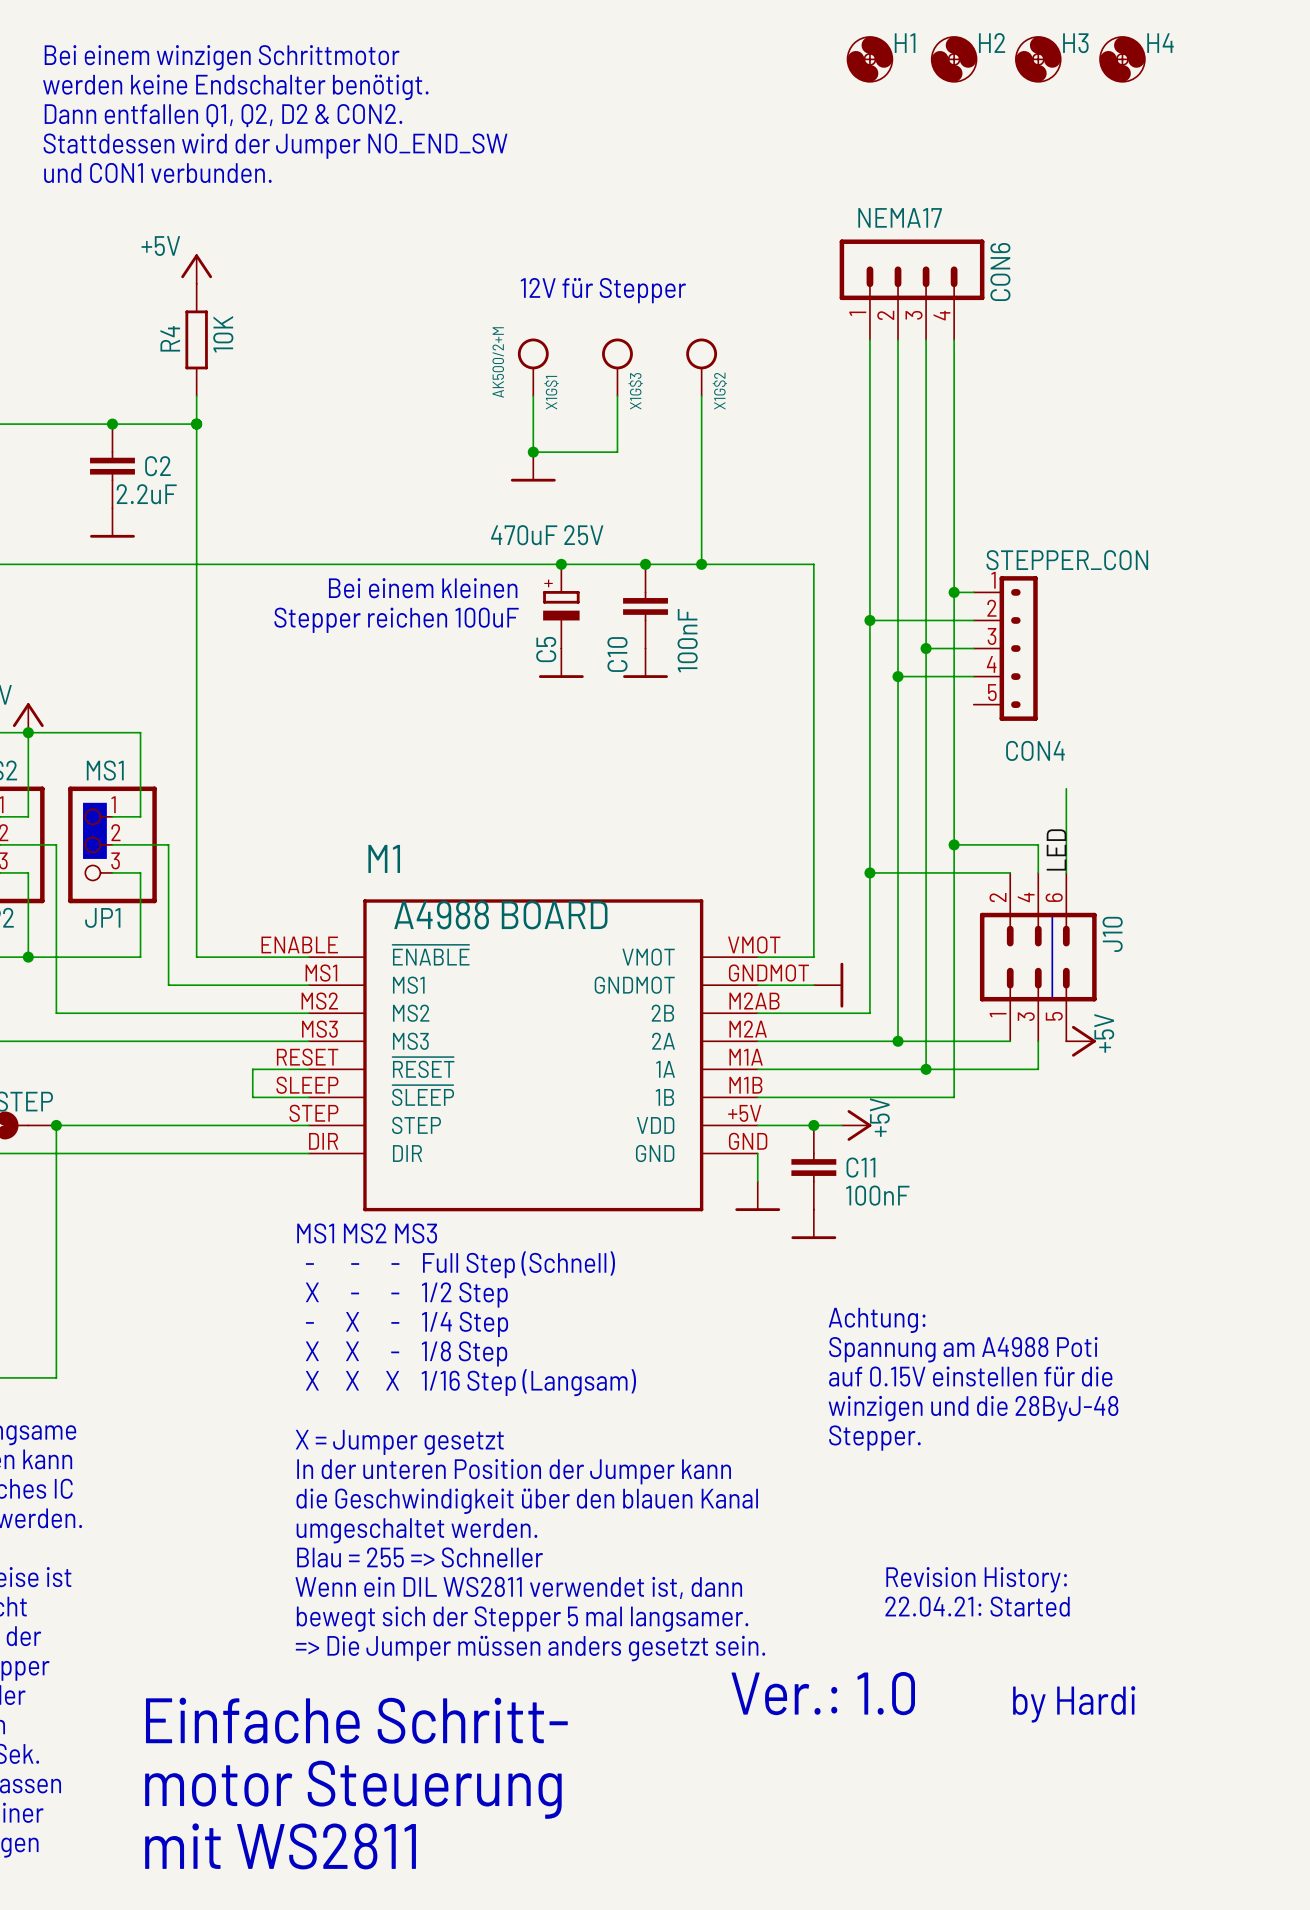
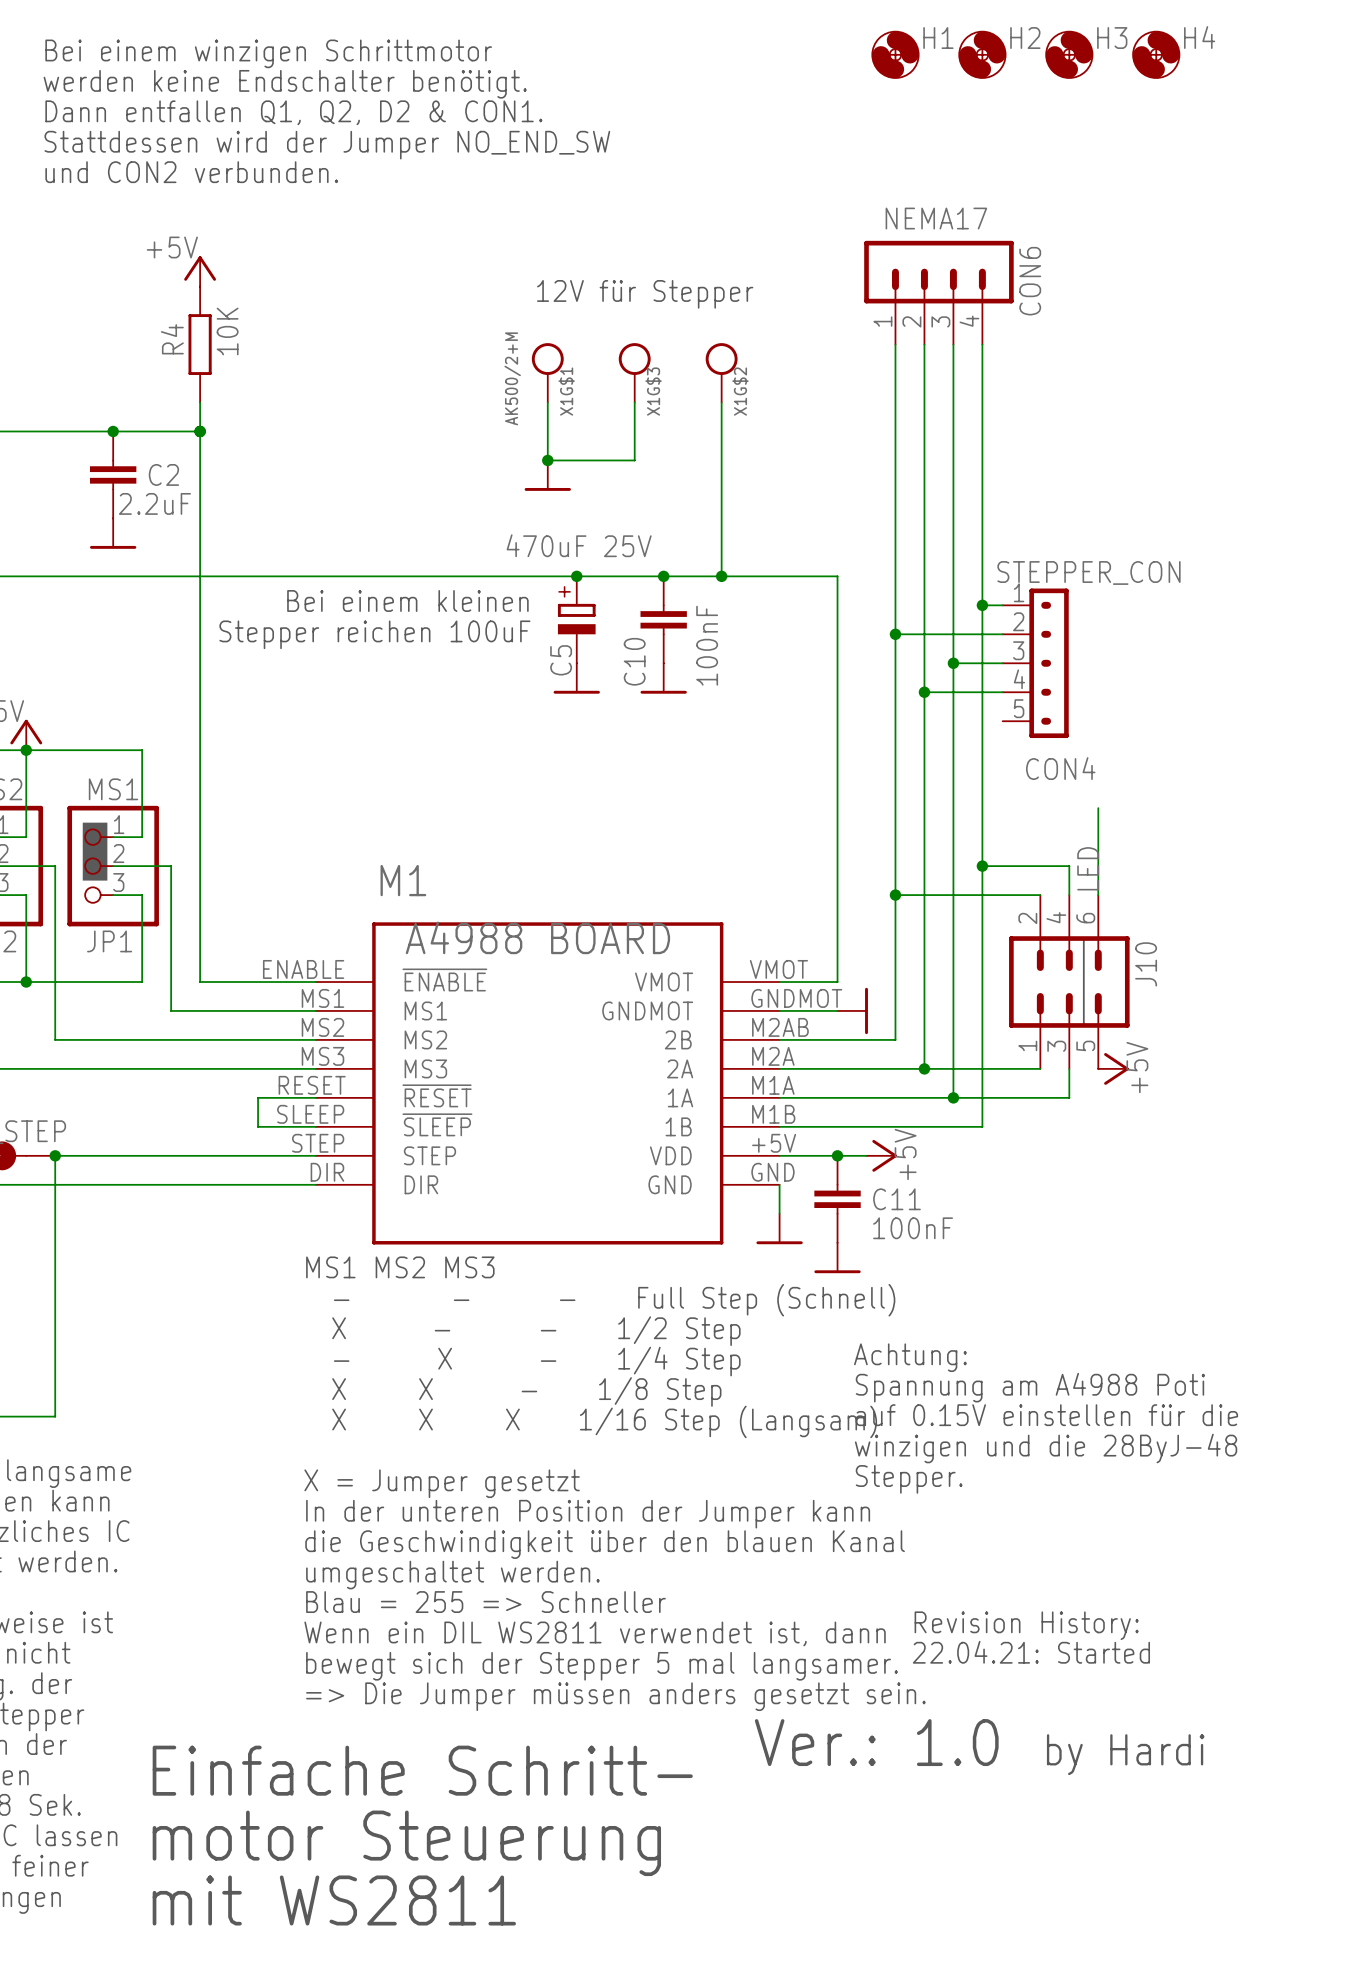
text: Dann entfallen Q1, Q2, D2 & CON2. (223, 115) -> Dann entfallen Q1, Q2, D2 & CON1. (293, 112)
text: und CON1 verbunden. (157, 173) -> und CON2 verbunden. (191, 172)

